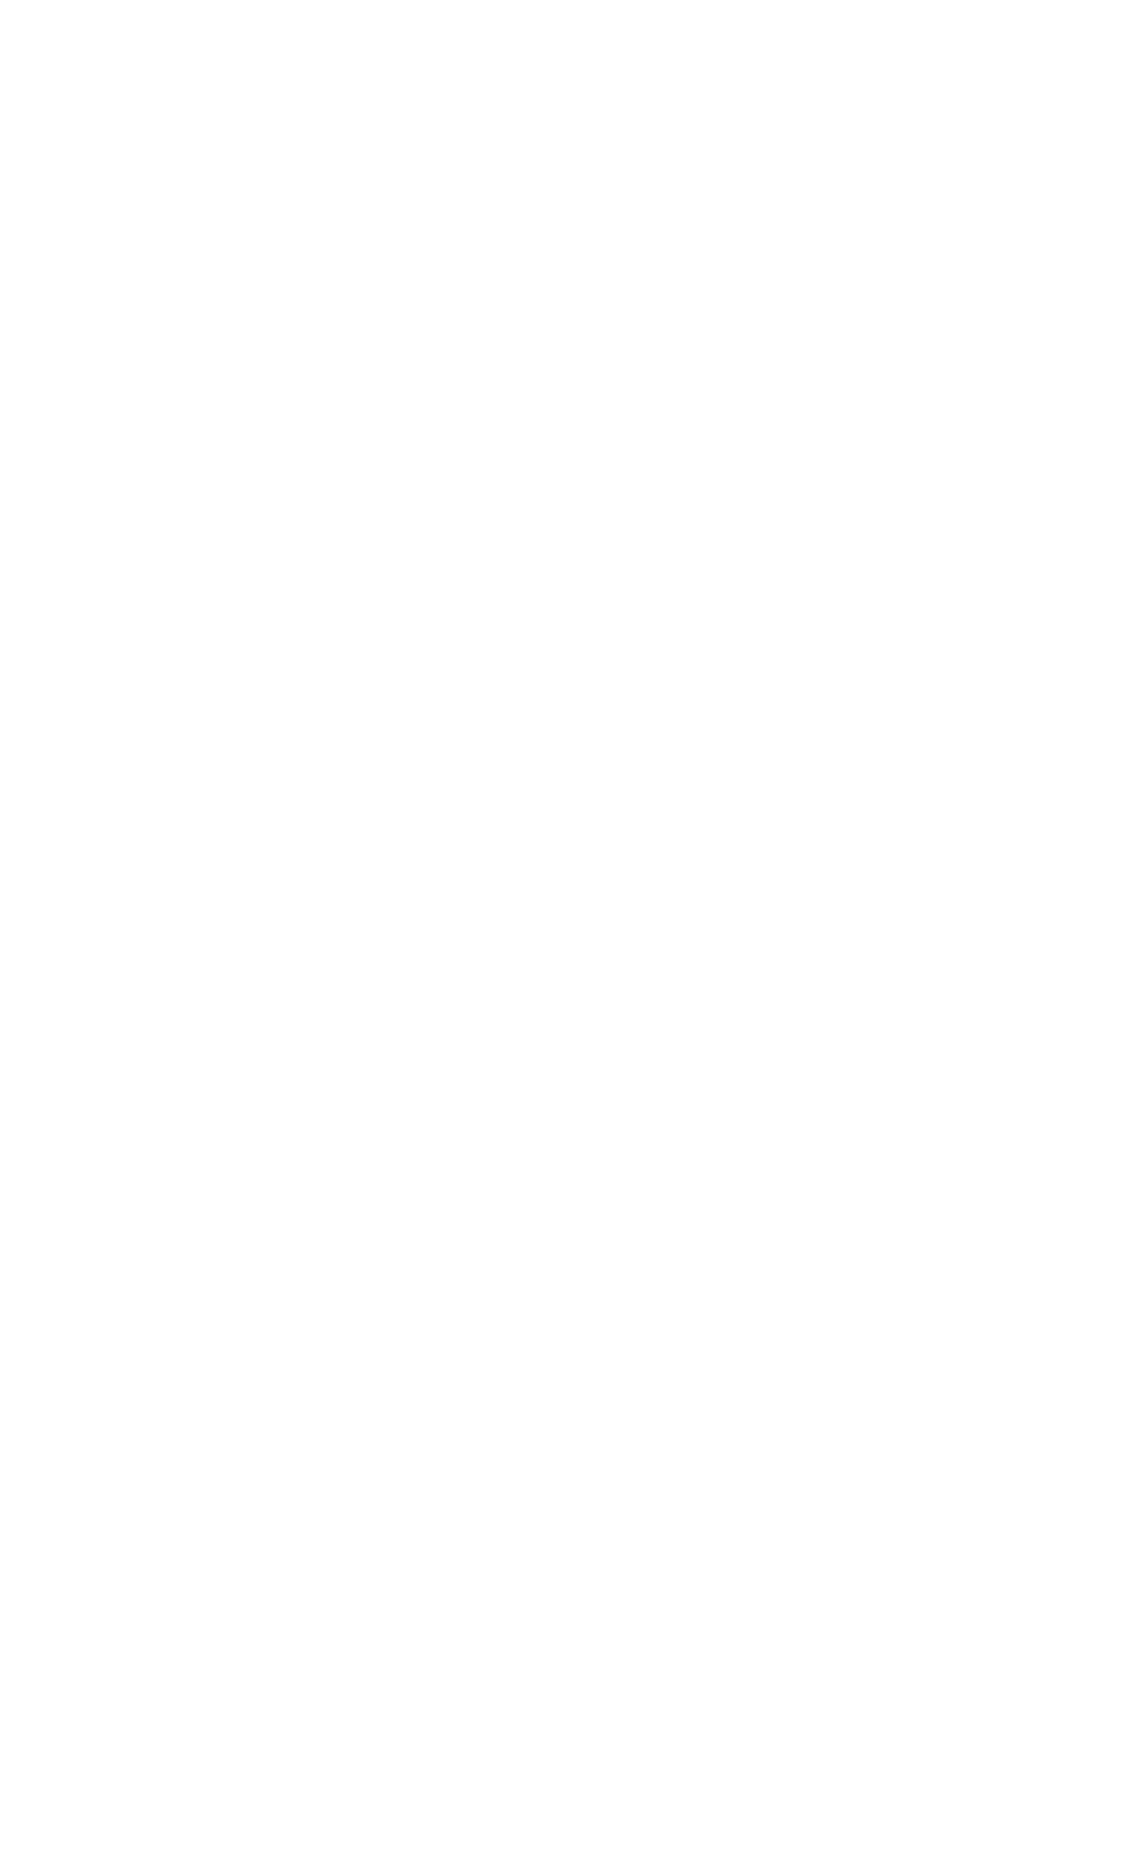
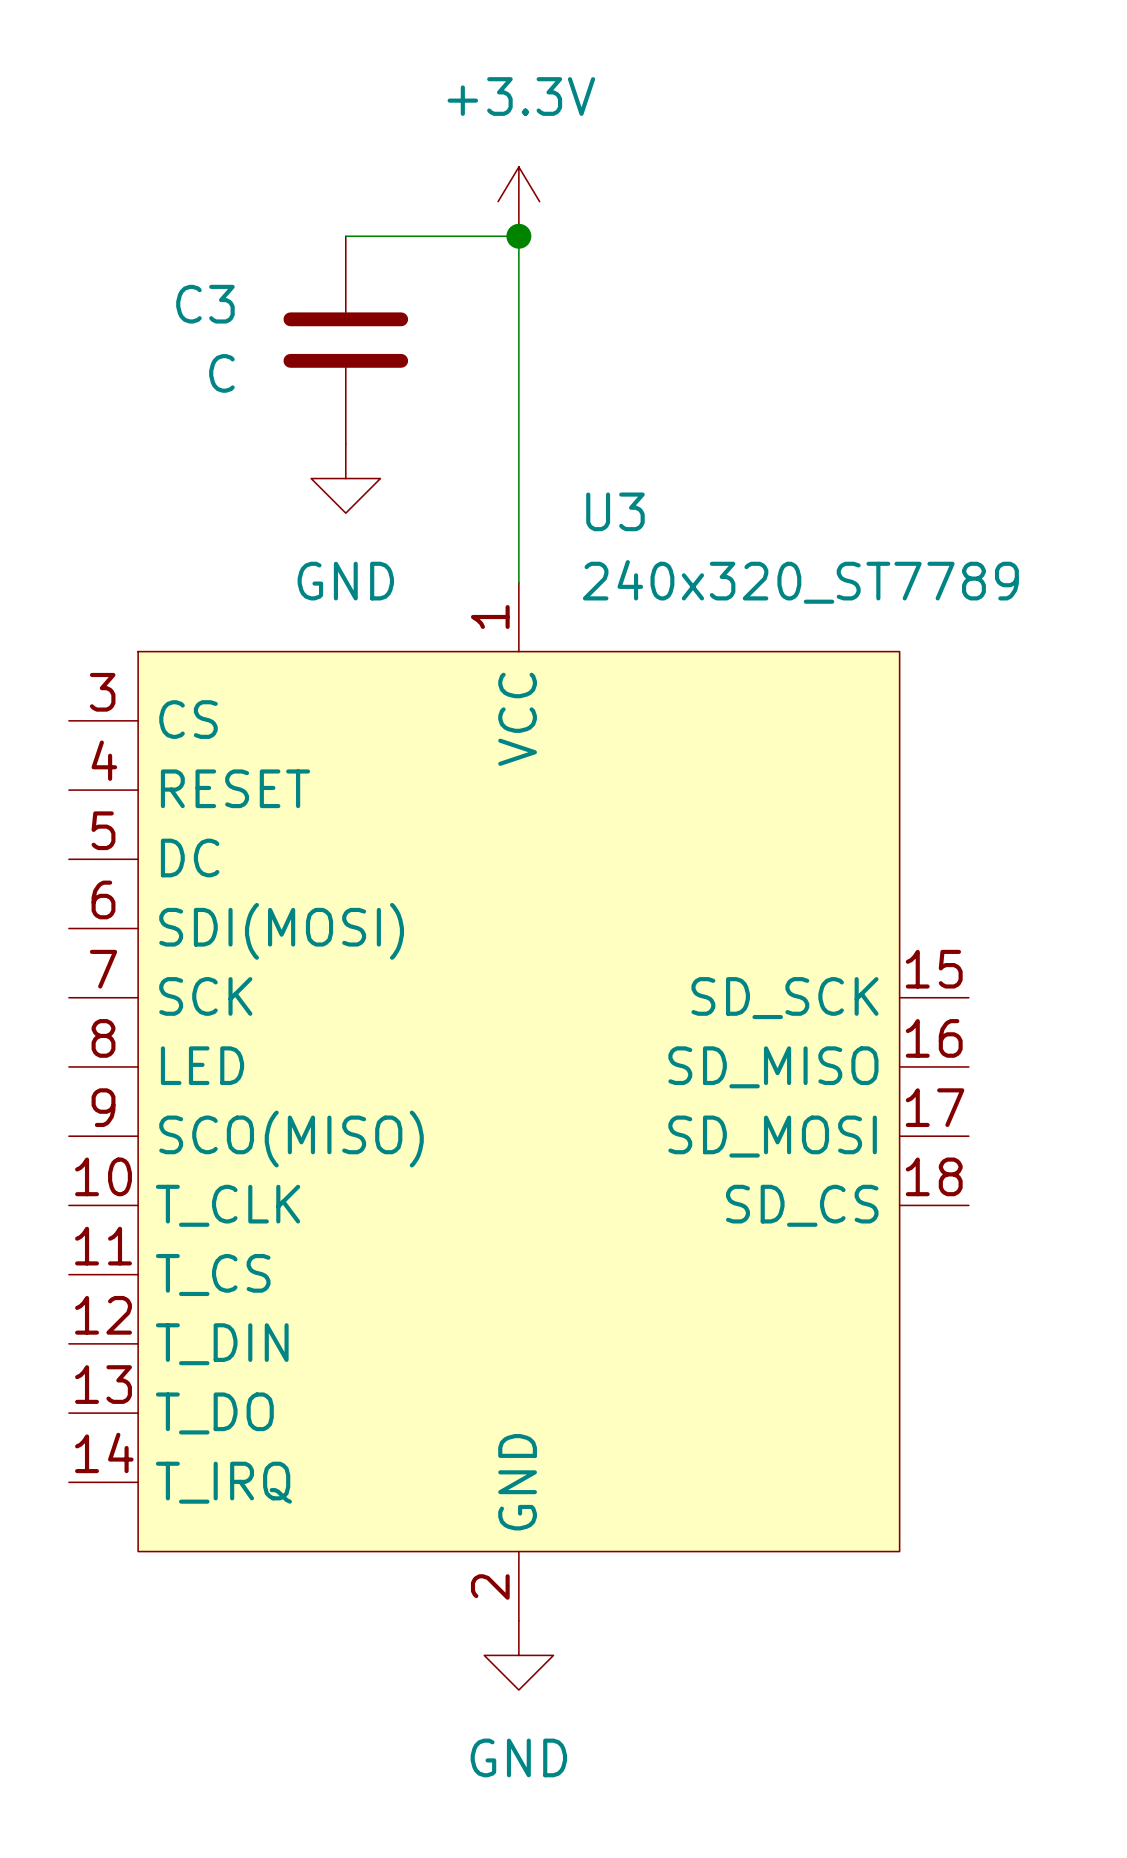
power symbol: none -> +3.3V (518, 201)
wire: none -> (345, 236) (518, 236) (518, 582)
junction: none -> (518, 236)
C3: none -> C (345, 340)
power symbol: none -> GND (345, 478)
U3: none -> 240x320_ST7789 (518, 1101)
power symbol: none -> GND (518, 1655)

